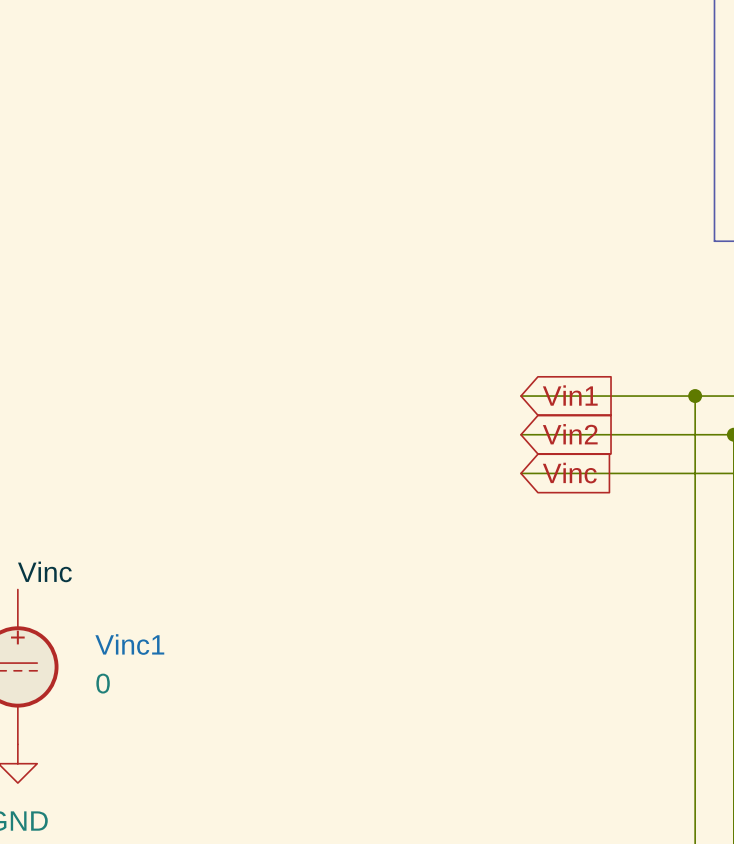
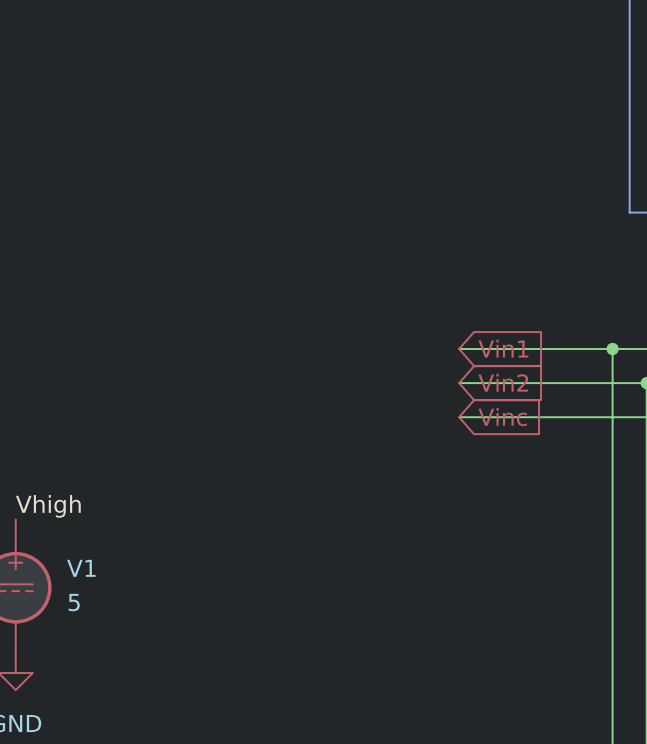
label: Vinc (44, 571) -> Vhigh (48, 506)
Vinc1 name: Vinc1 (129, 644) -> V1 (81, 568)
Vinc1 value: 0 (103, 683) -> 5 (74, 602)

